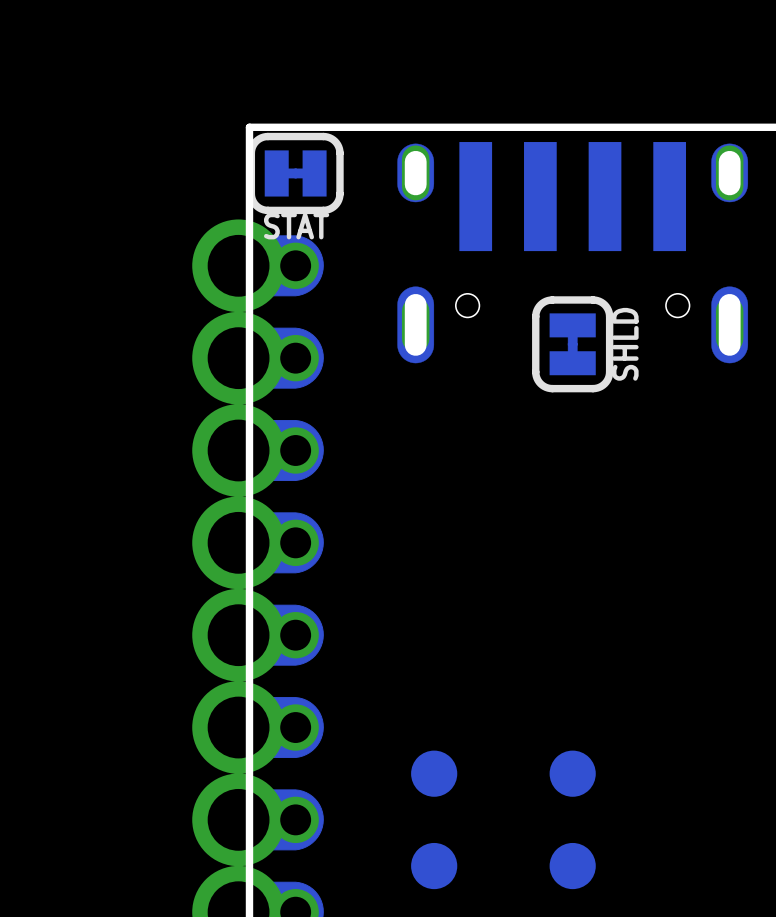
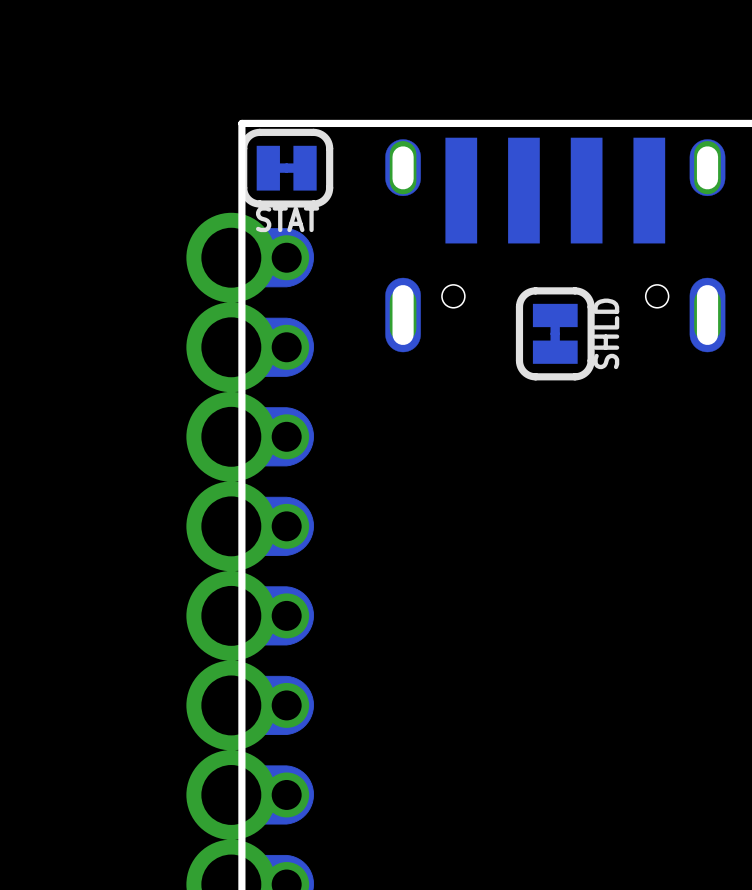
part: (434, 773) -> none
part: (572, 773) -> none
part: (434, 866) -> none
part: (572, 866) -> none

